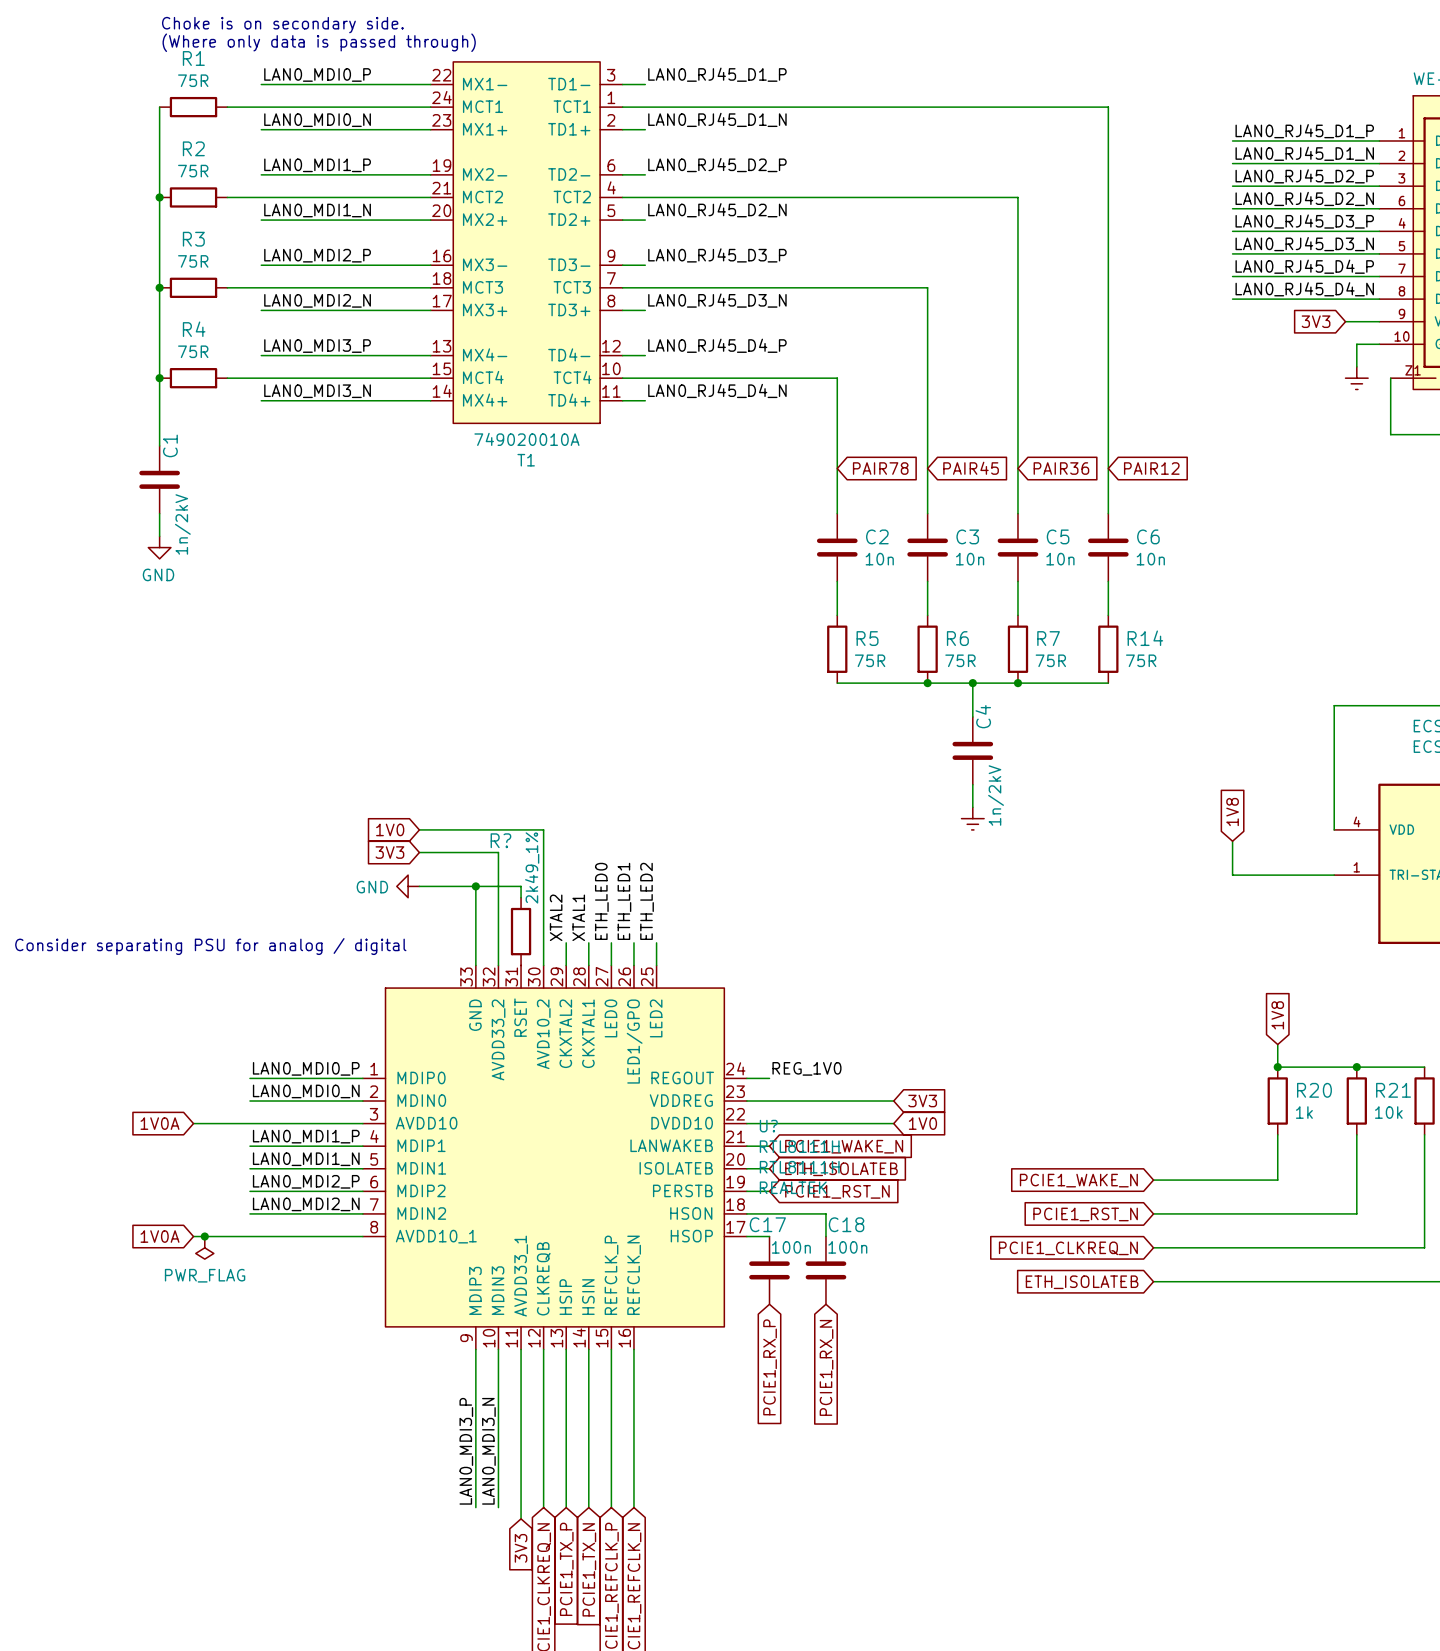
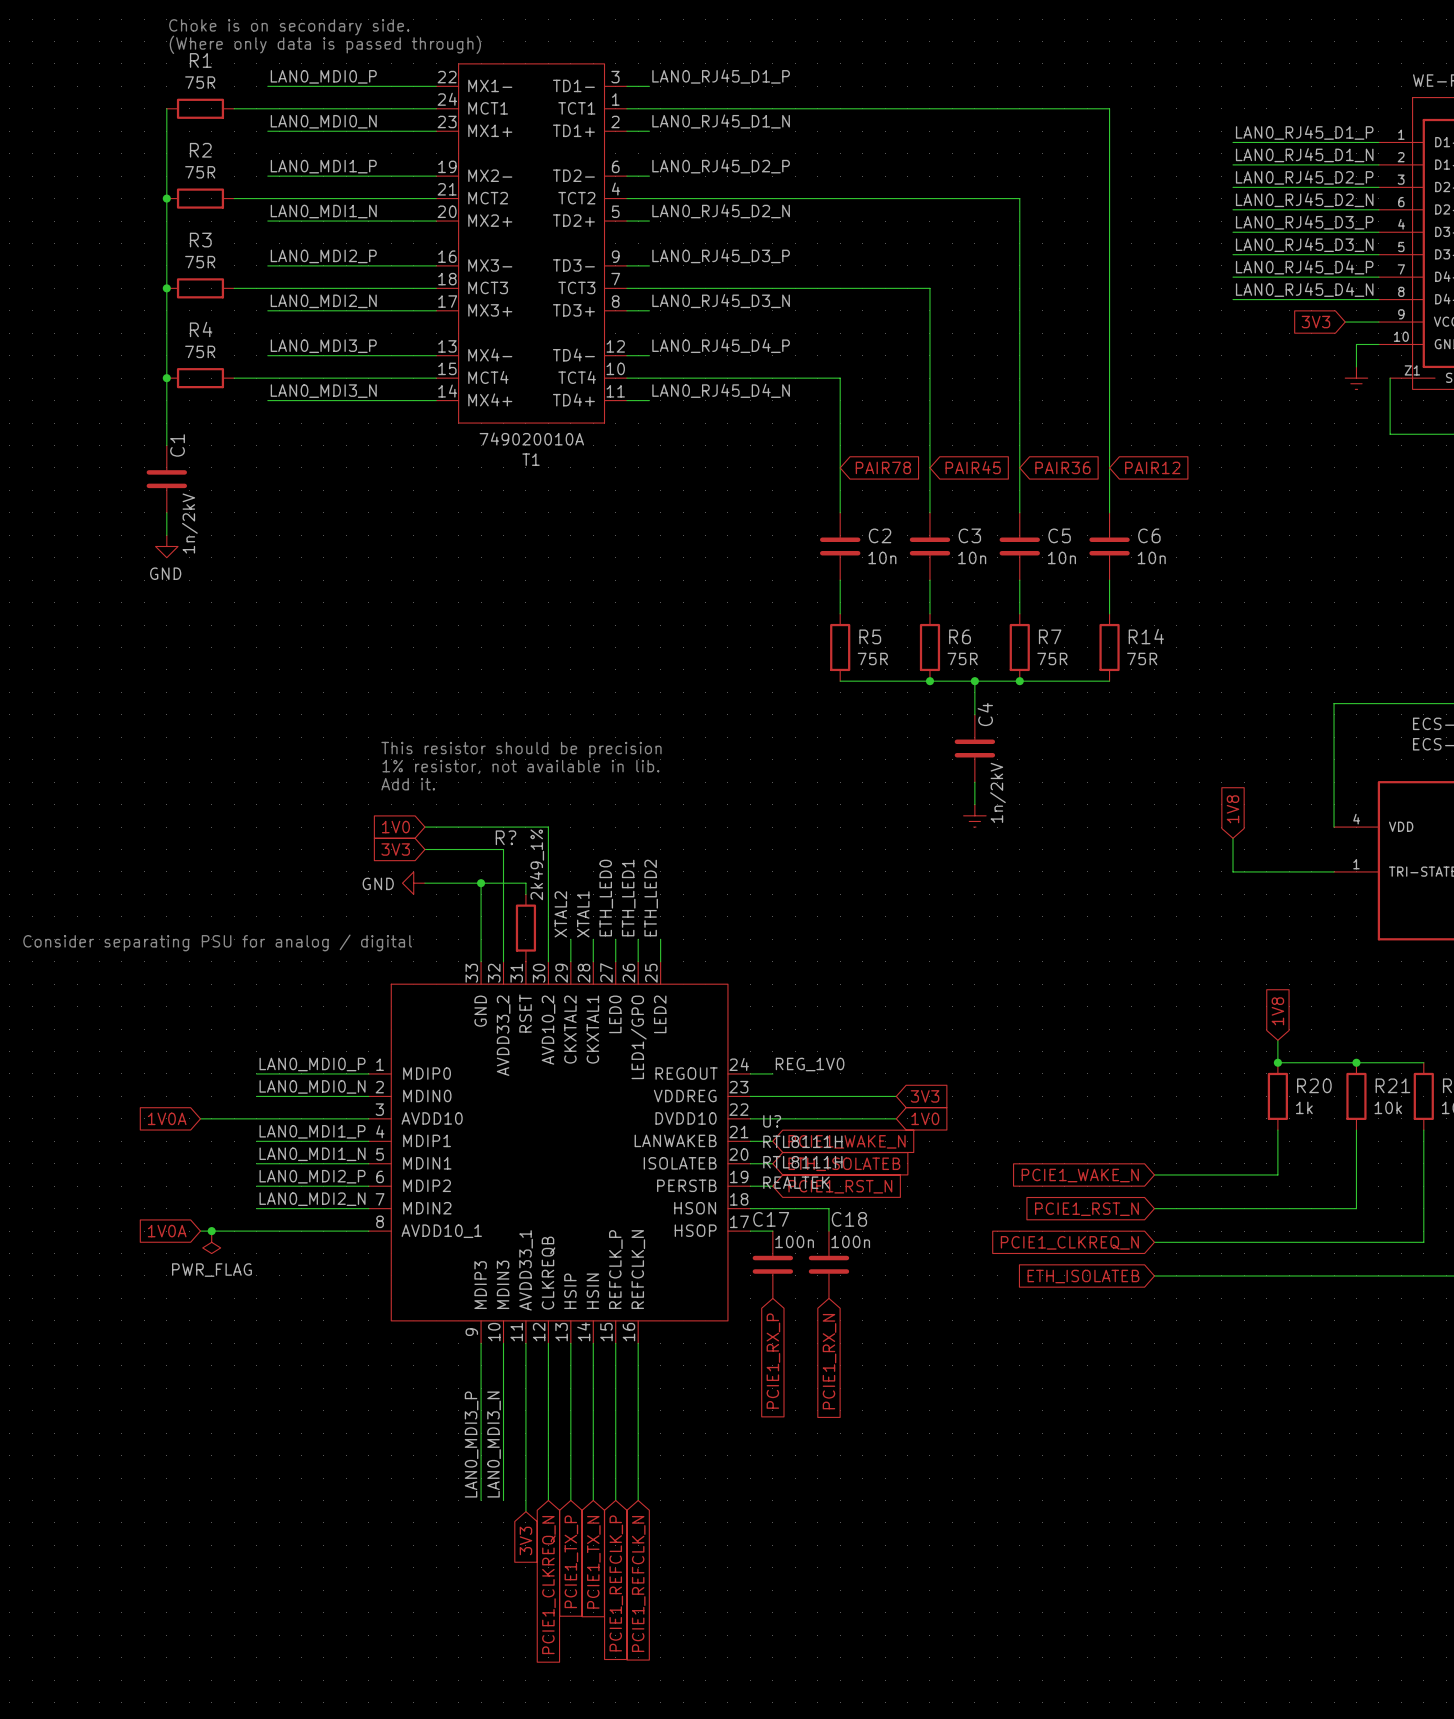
text: none -> This resistor should be precision (521, 749)
text: none -> 1% resistor, not available in lib. (520, 766)
text: none -> Add it. (408, 784)

